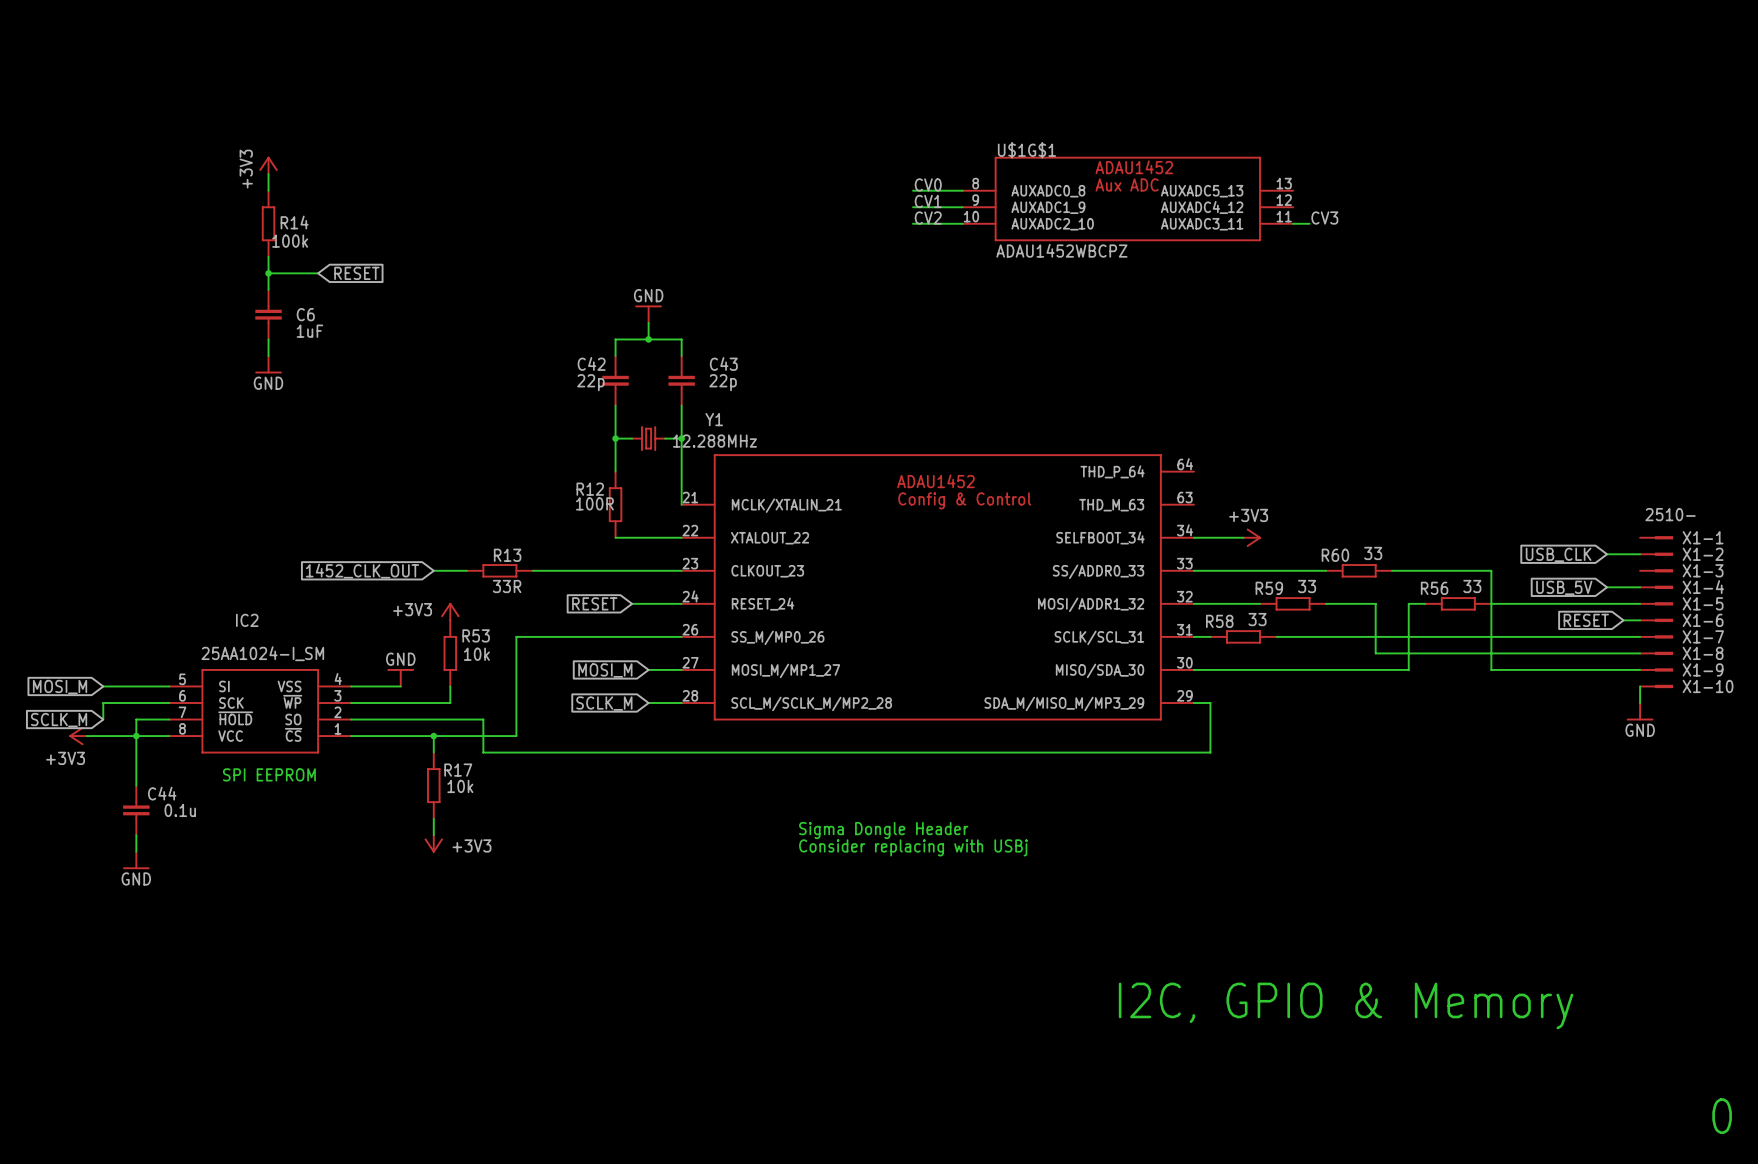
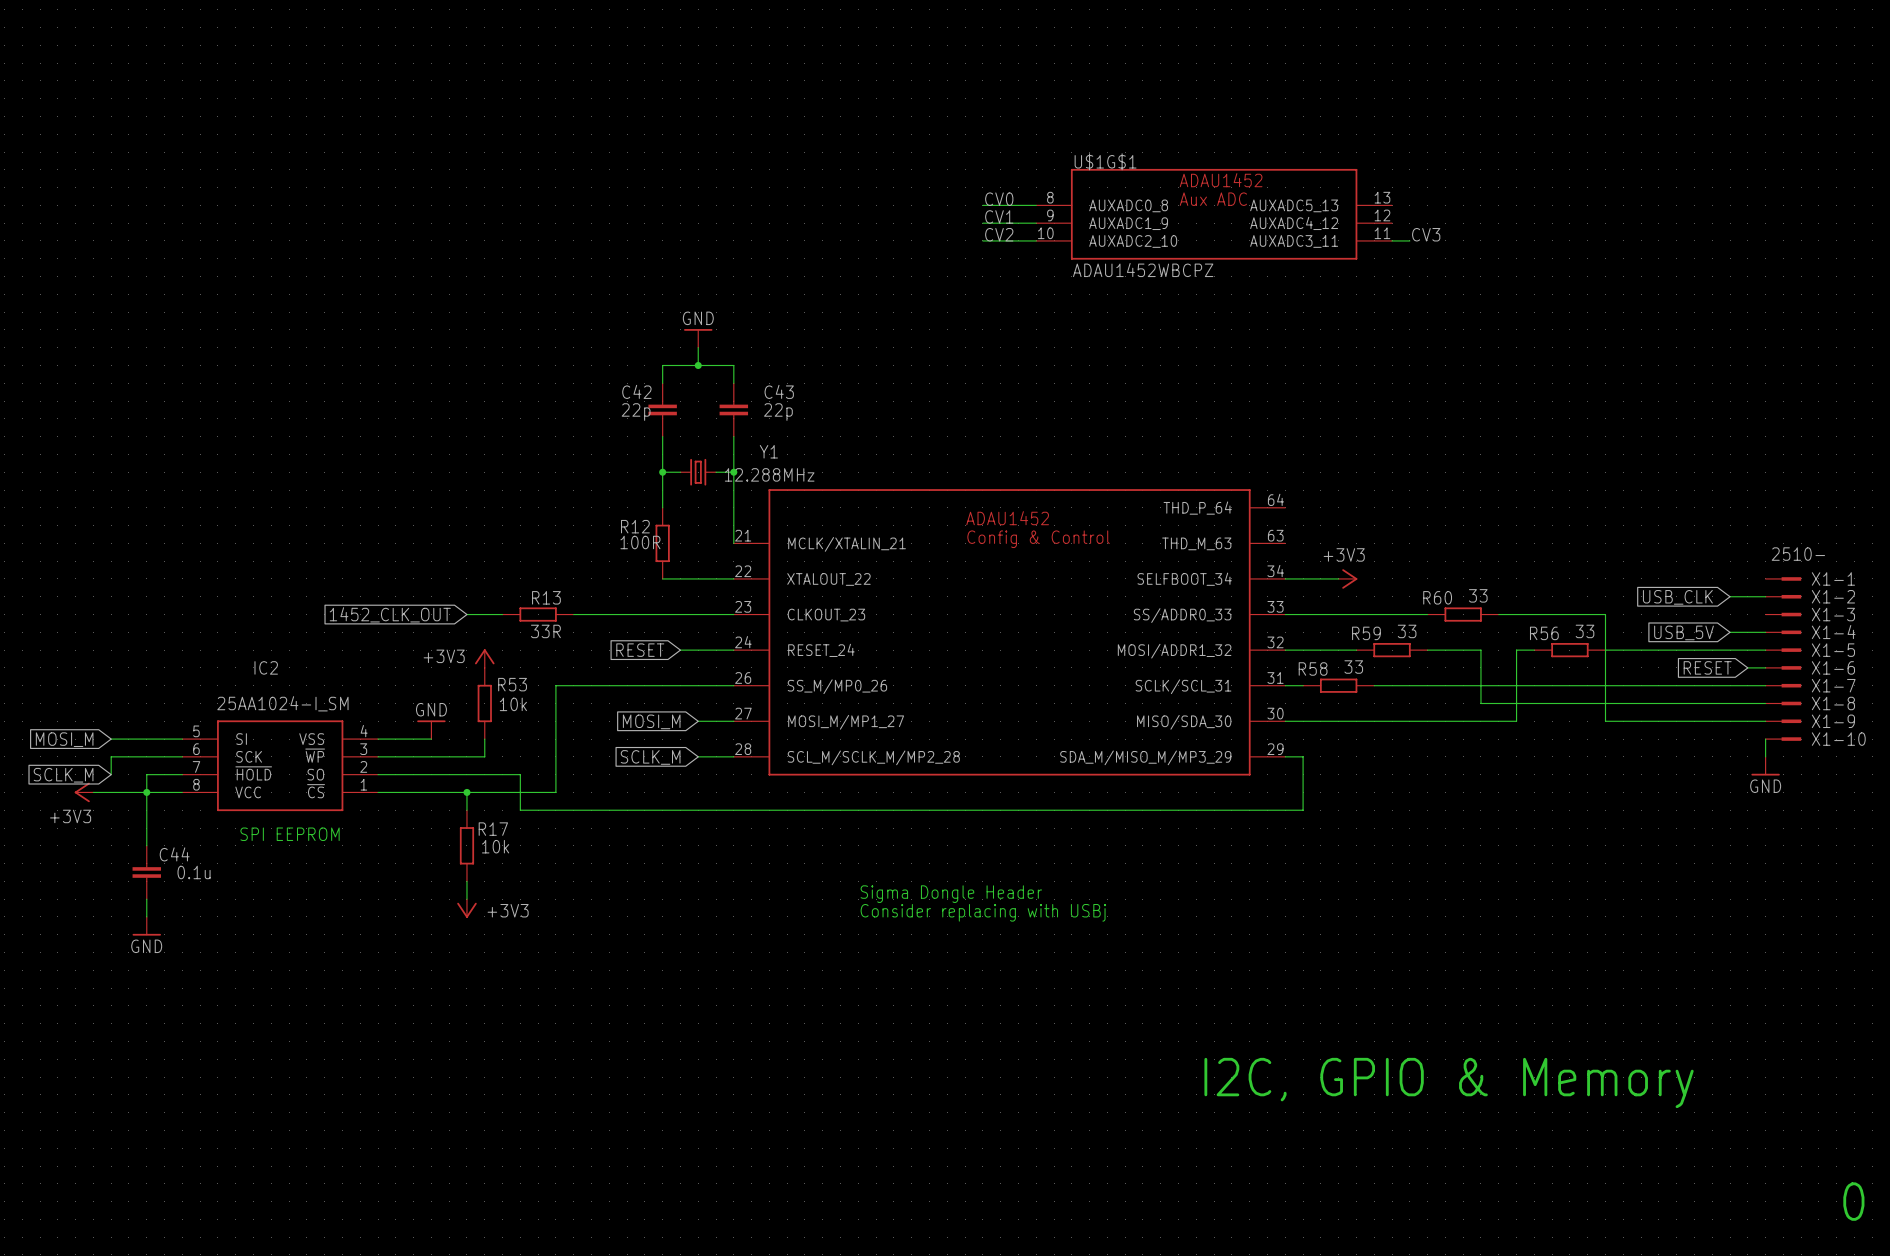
power symbol: +3V3 (268, 165) -> none
wire: (268, 174) (268, 190) -> none
R14: 100k (268, 223) -> none
wire: (268, 256) (268, 289) -> none
wire: (268, 273) (318, 273) -> none
junction: (268, 273) -> none
global label: RESET (356, 273) -> none
C6: 1uF (268, 314) -> none
wire: (268, 339) (268, 355) -> none
power symbol: GND (268, 364) -> none

